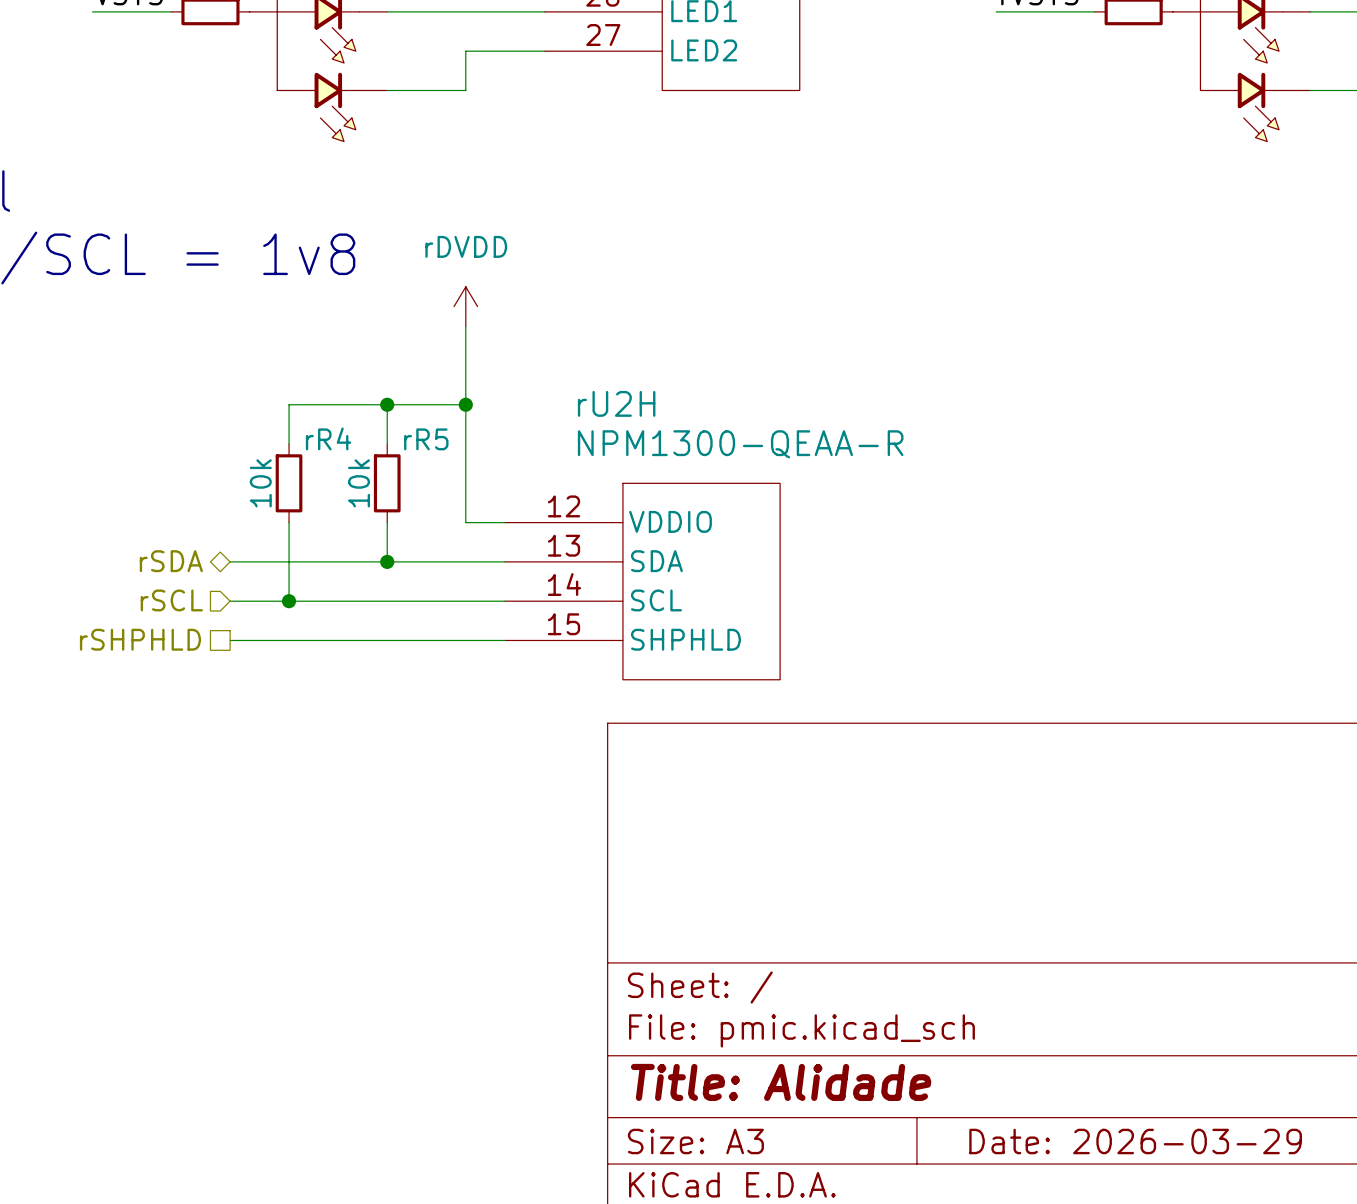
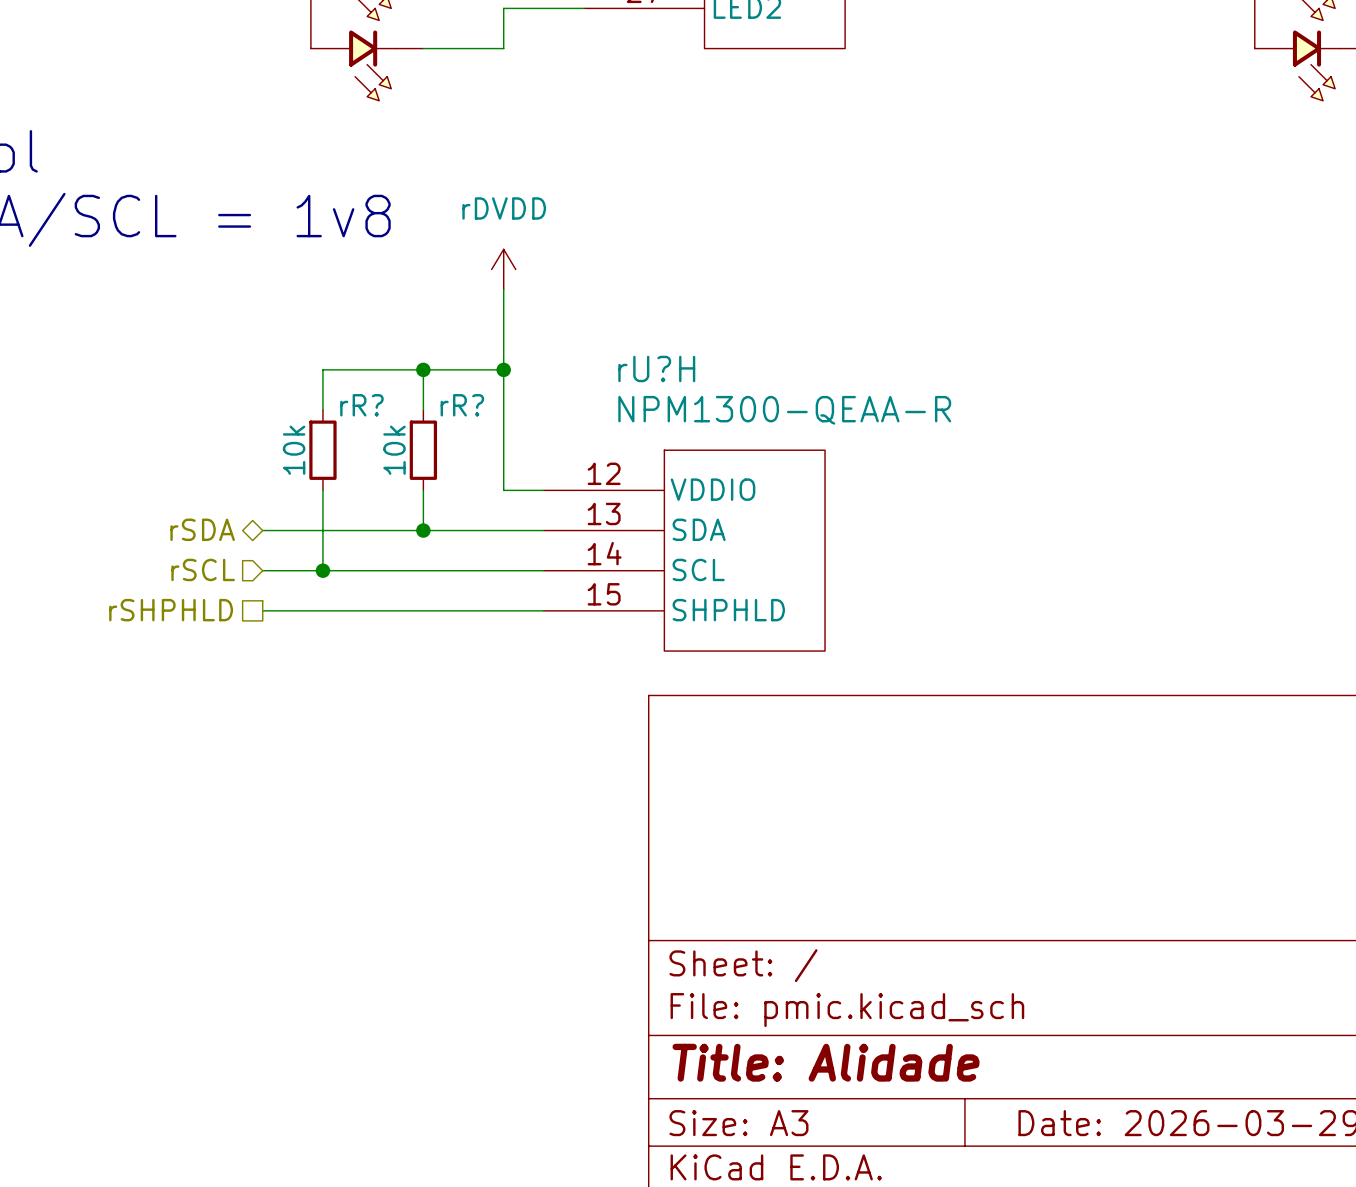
rU2H name: rU2H (616, 403) -> rU?H (656, 368)
rR4 name: rR4 (328, 438) -> rR? (361, 405)
rR5 name: rR5 (426, 439) -> rR? (462, 405)

